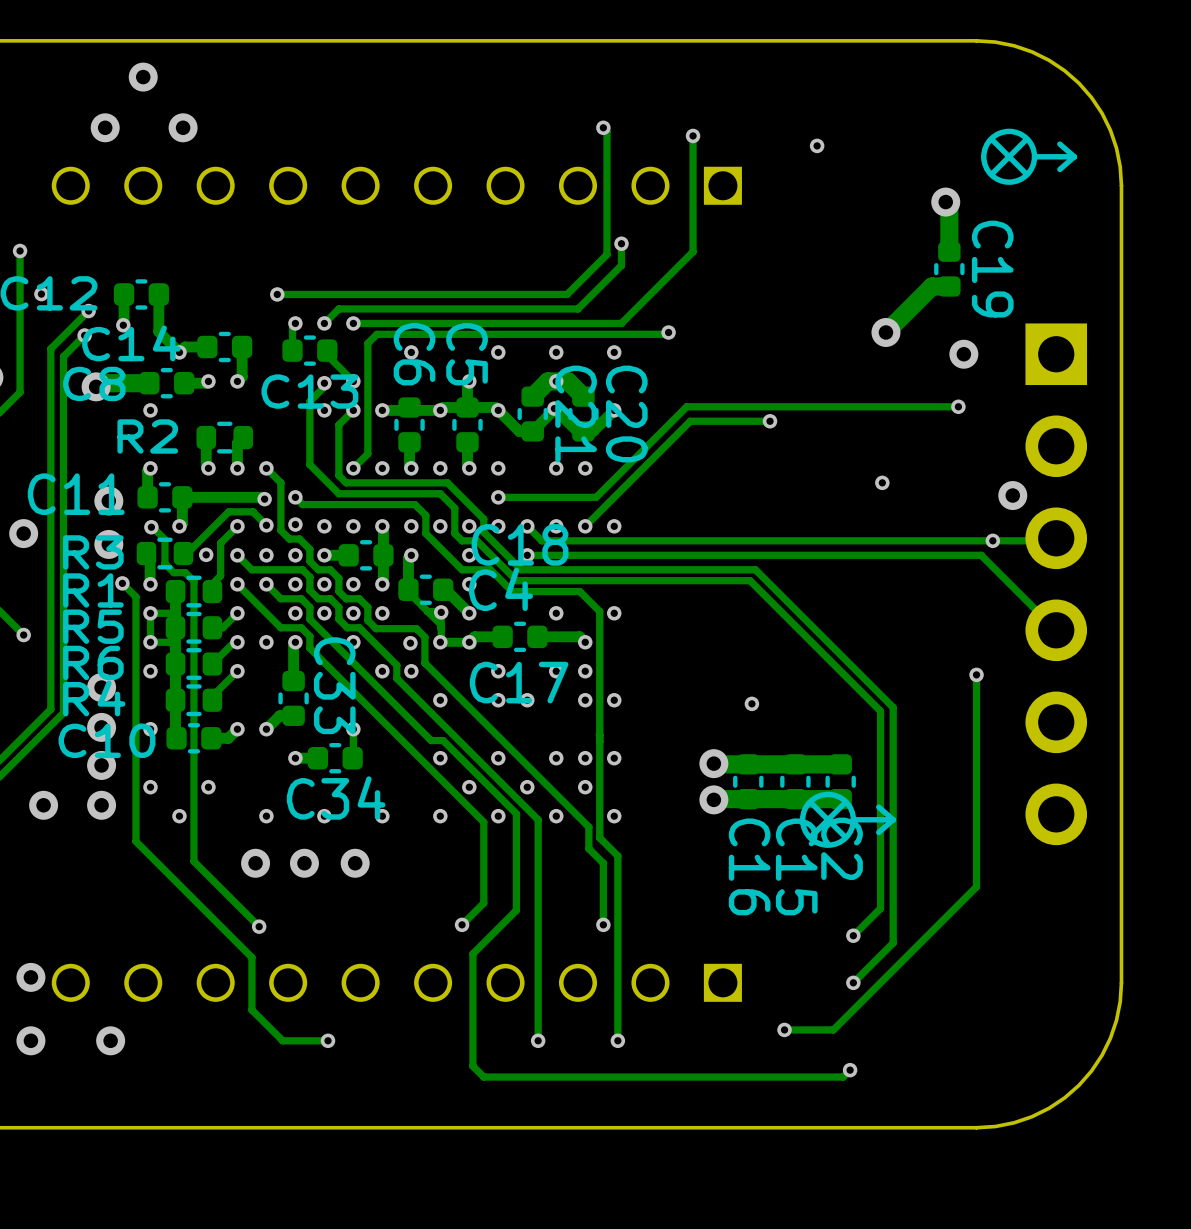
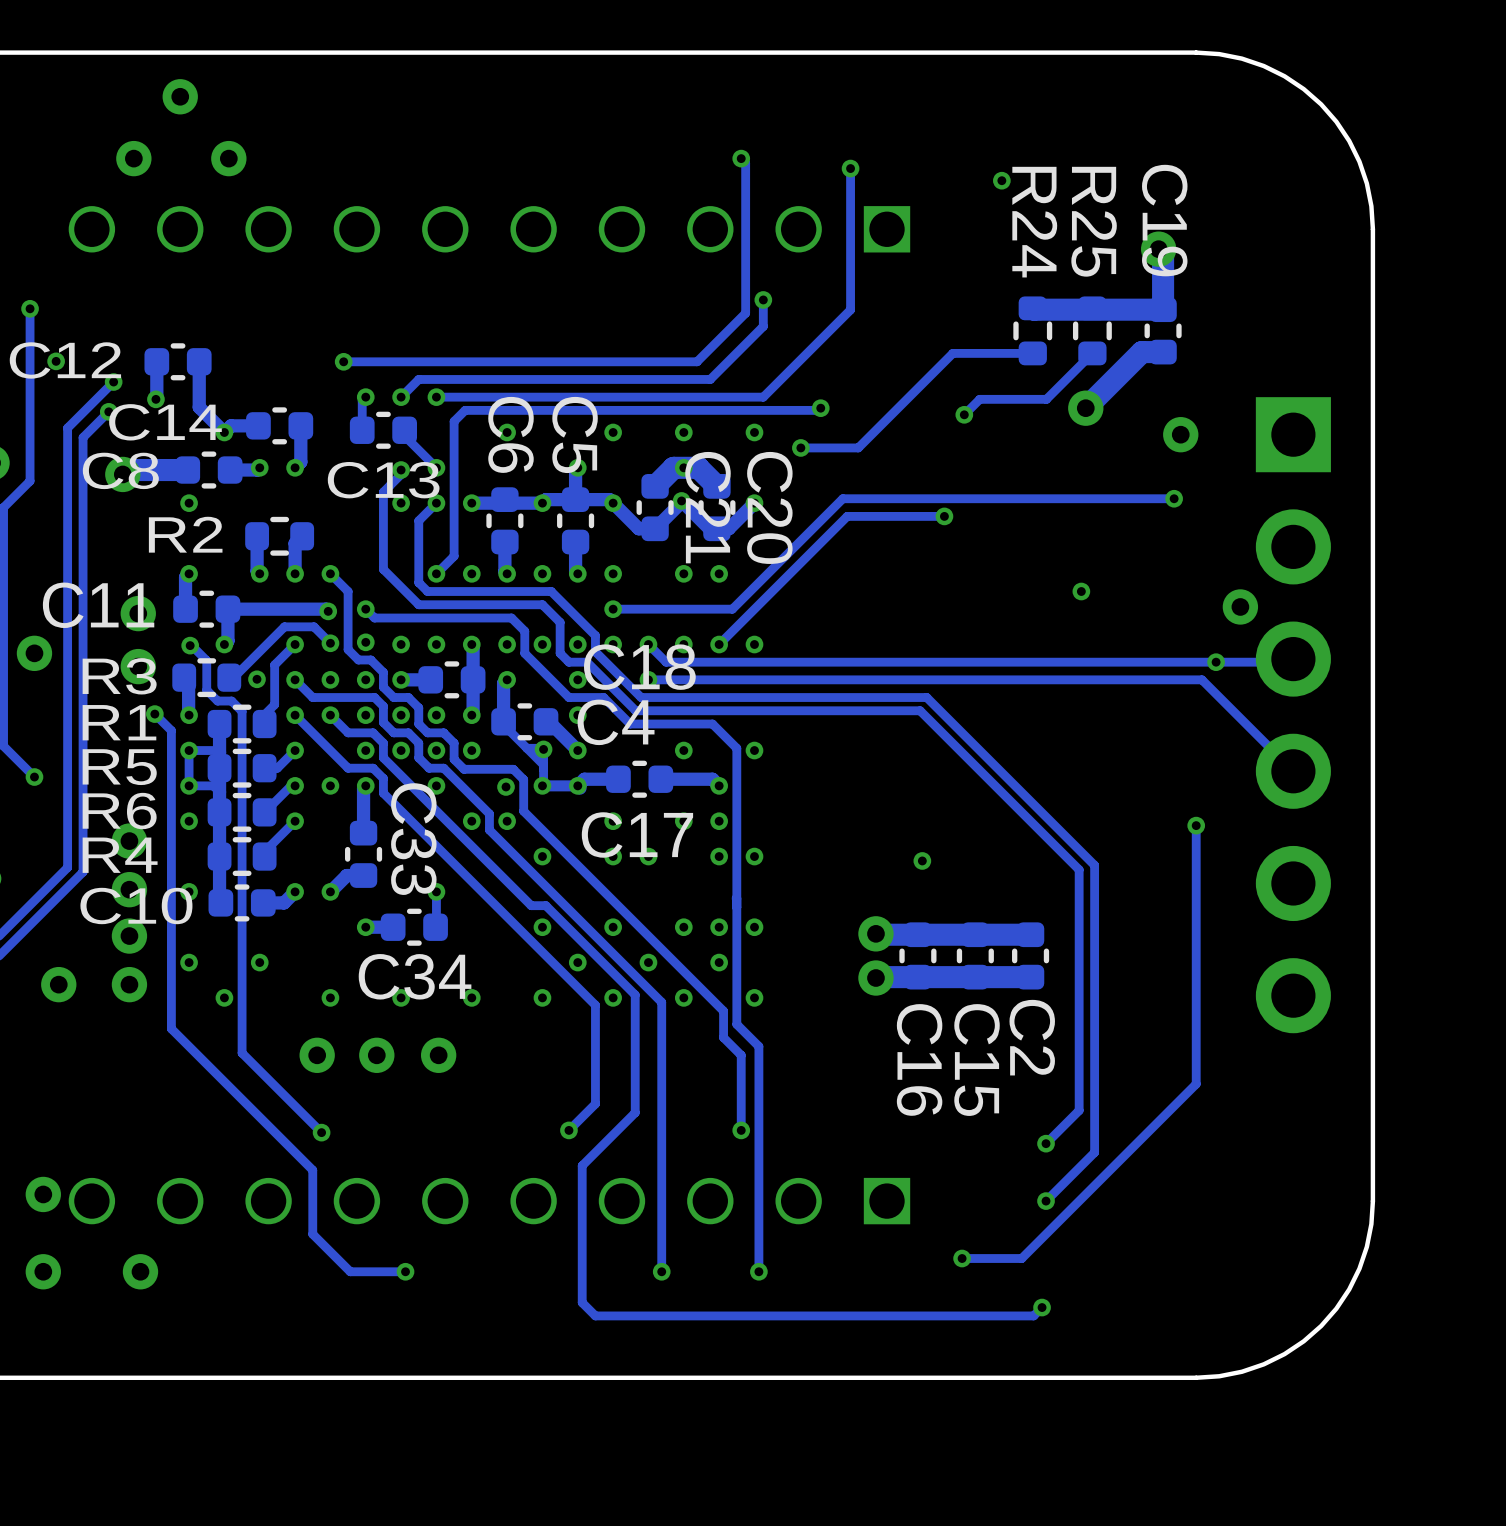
drawing: [981, 128, 1078, 185] -> none
track: none -> (1032, 308) (1163, 309)
R24: none -> (1032, 330)
R25: none -> (1092, 330)
C19 name position: C19 (992, 269) -> C19 (1164, 220)
track: none -> (1032, 353) (952, 353) (858, 447) (800, 447)
track: none -> (1092, 353) (1046, 399) (979, 399) (964, 414)
via: none -> (964, 414)
via: none -> (800, 447)
drawing: [799, 791, 896, 848] -> none

